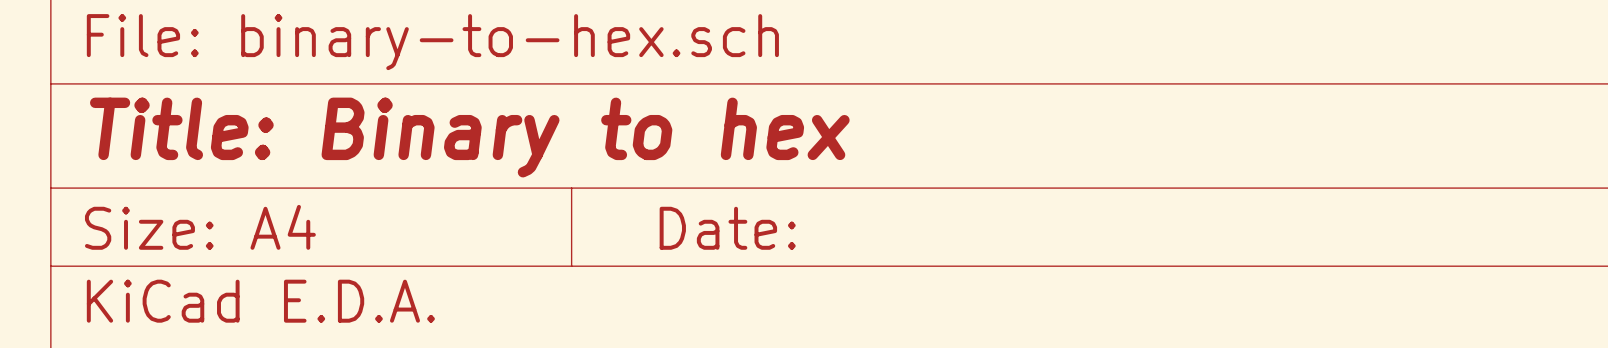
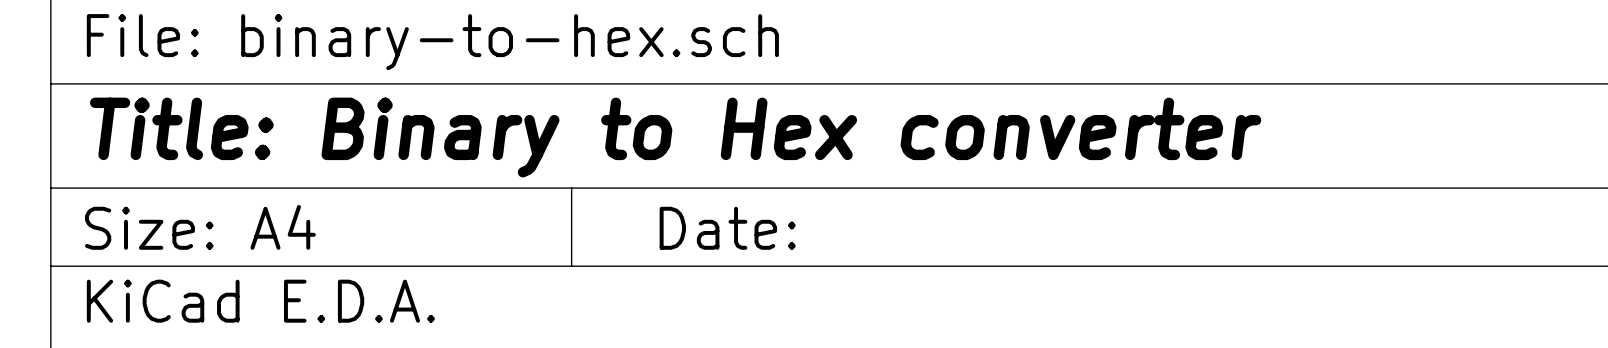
title block: Title: Binary to hex (469, 137) -> Title: Binary to Hex converter (675, 137)

